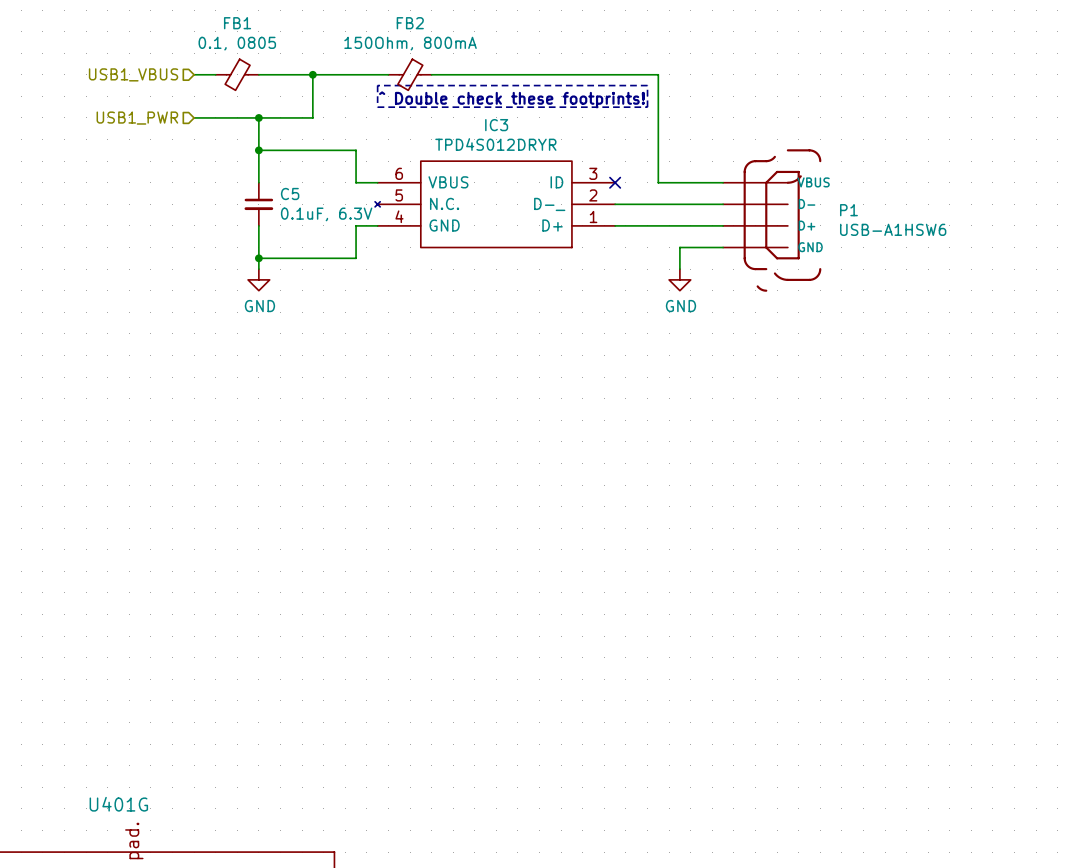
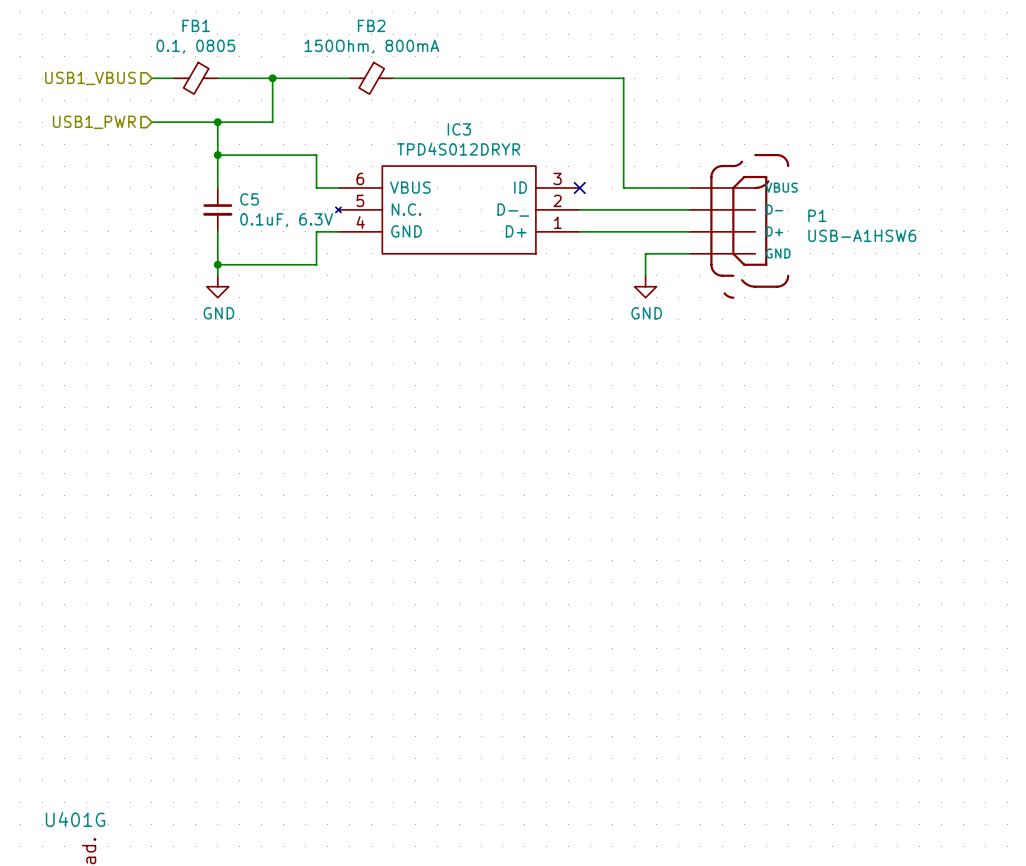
line: (377, 85) (647, 85) (647, 107) (377, 107) (377, 85) -> none
text: ^ Double check these footprints! (511, 99) -> none

